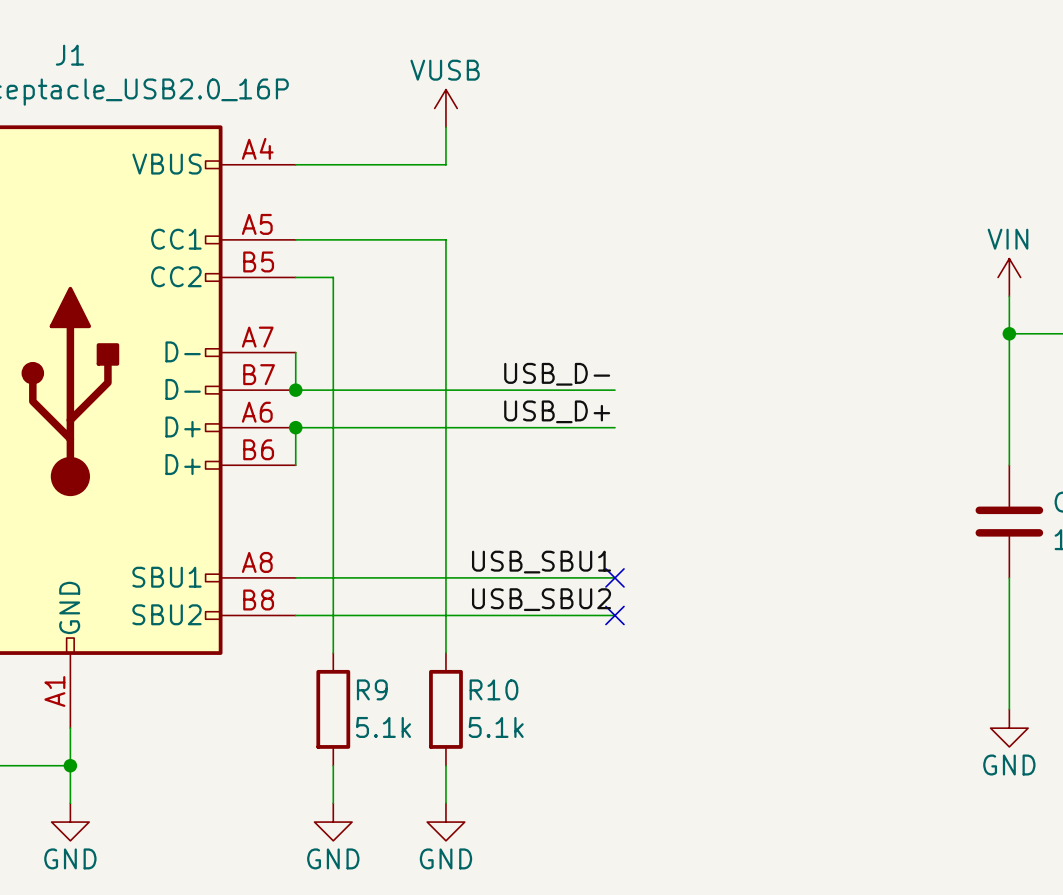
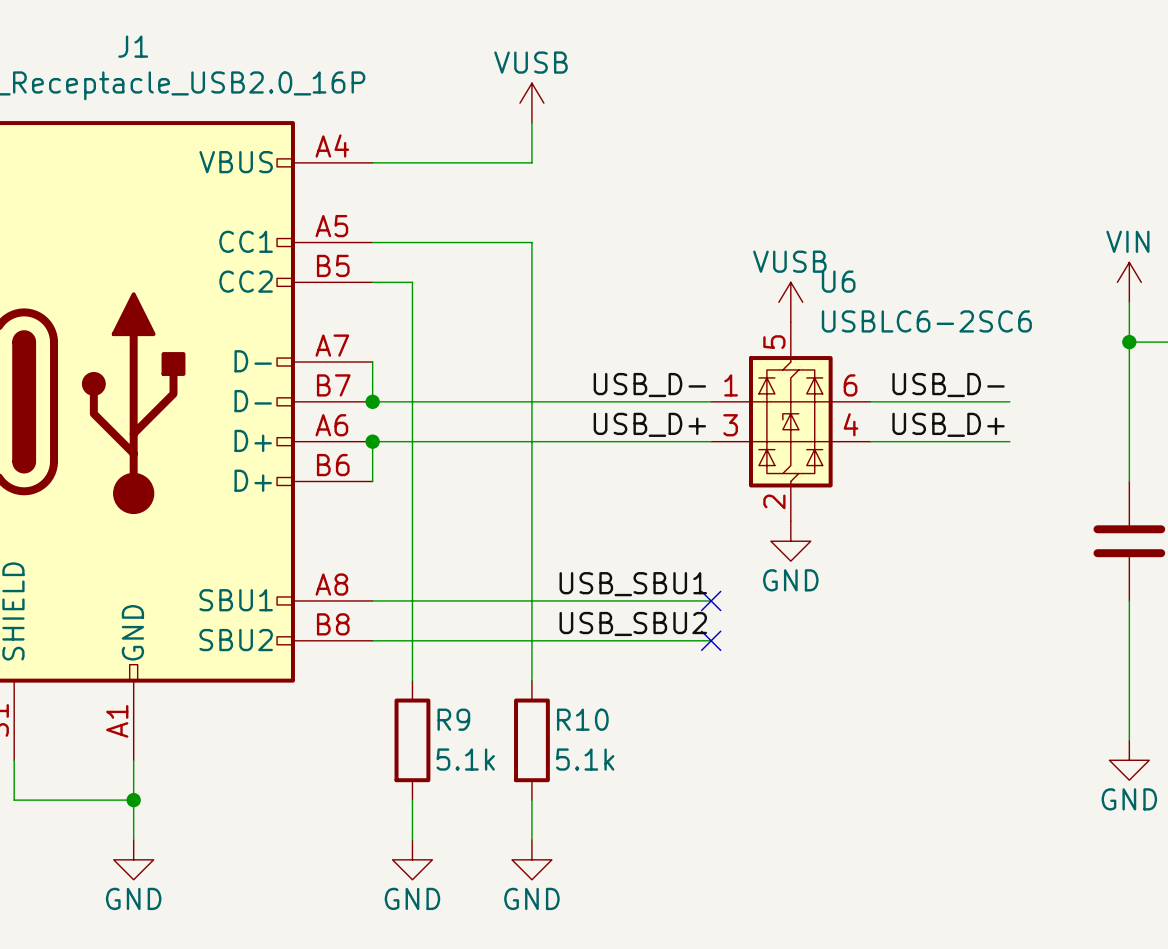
power symbol: none -> VUSB (790, 302)
label: none -> USB_D- (948, 385)
wire: none -> (870, 401) (1009, 401)
U6: none -> USBLC6-2SC6 (790, 421)
label: none -> USB_D+ (948, 424)
wire: none -> (870, 441) (1009, 441)
power symbol: none -> GND (790, 541)

